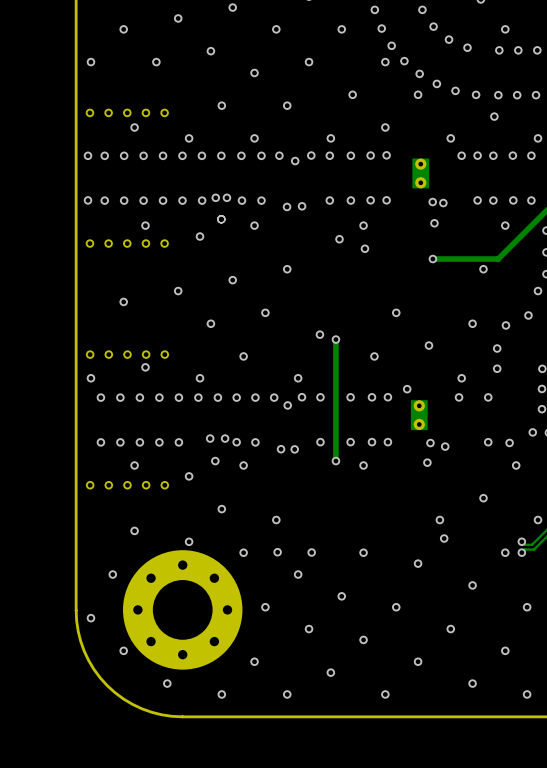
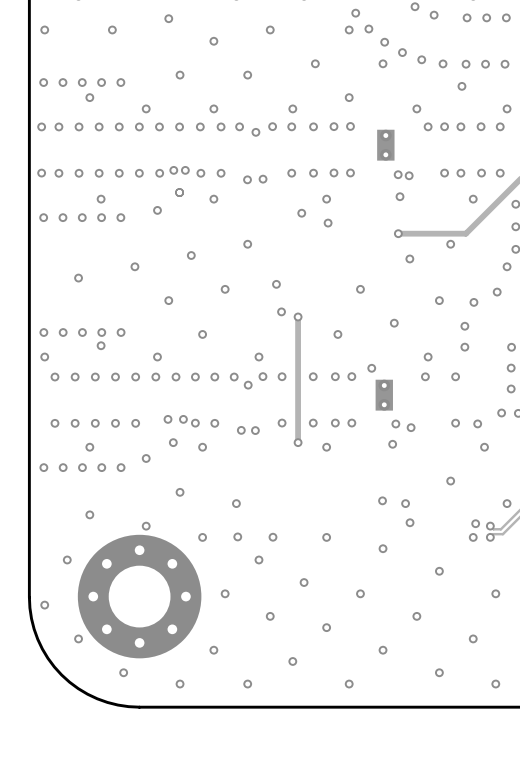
via: none -> (409, 258)
via: none -> (276, 284)
via: none -> (382, 500)
via: none -> (475, 523)

